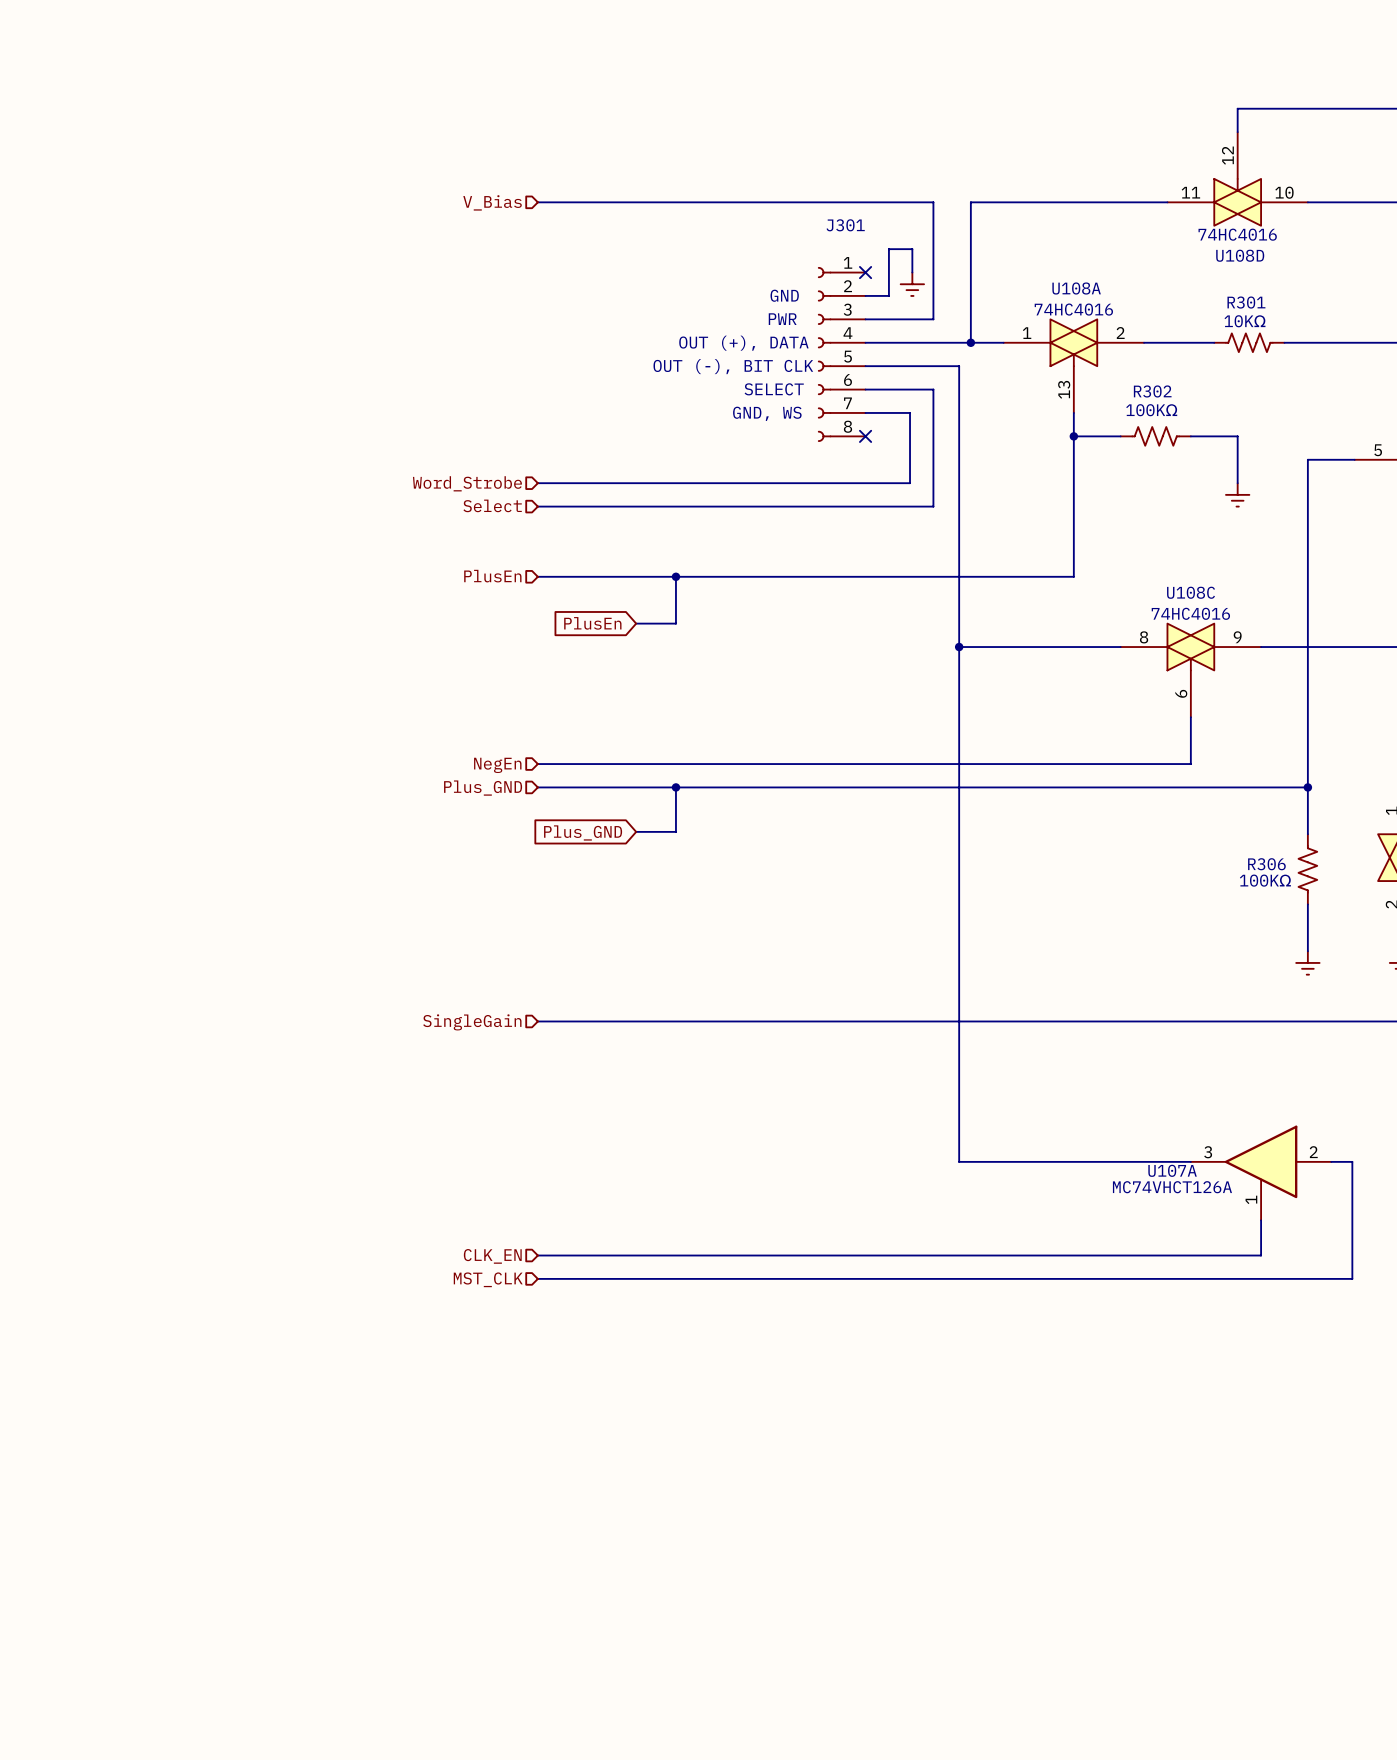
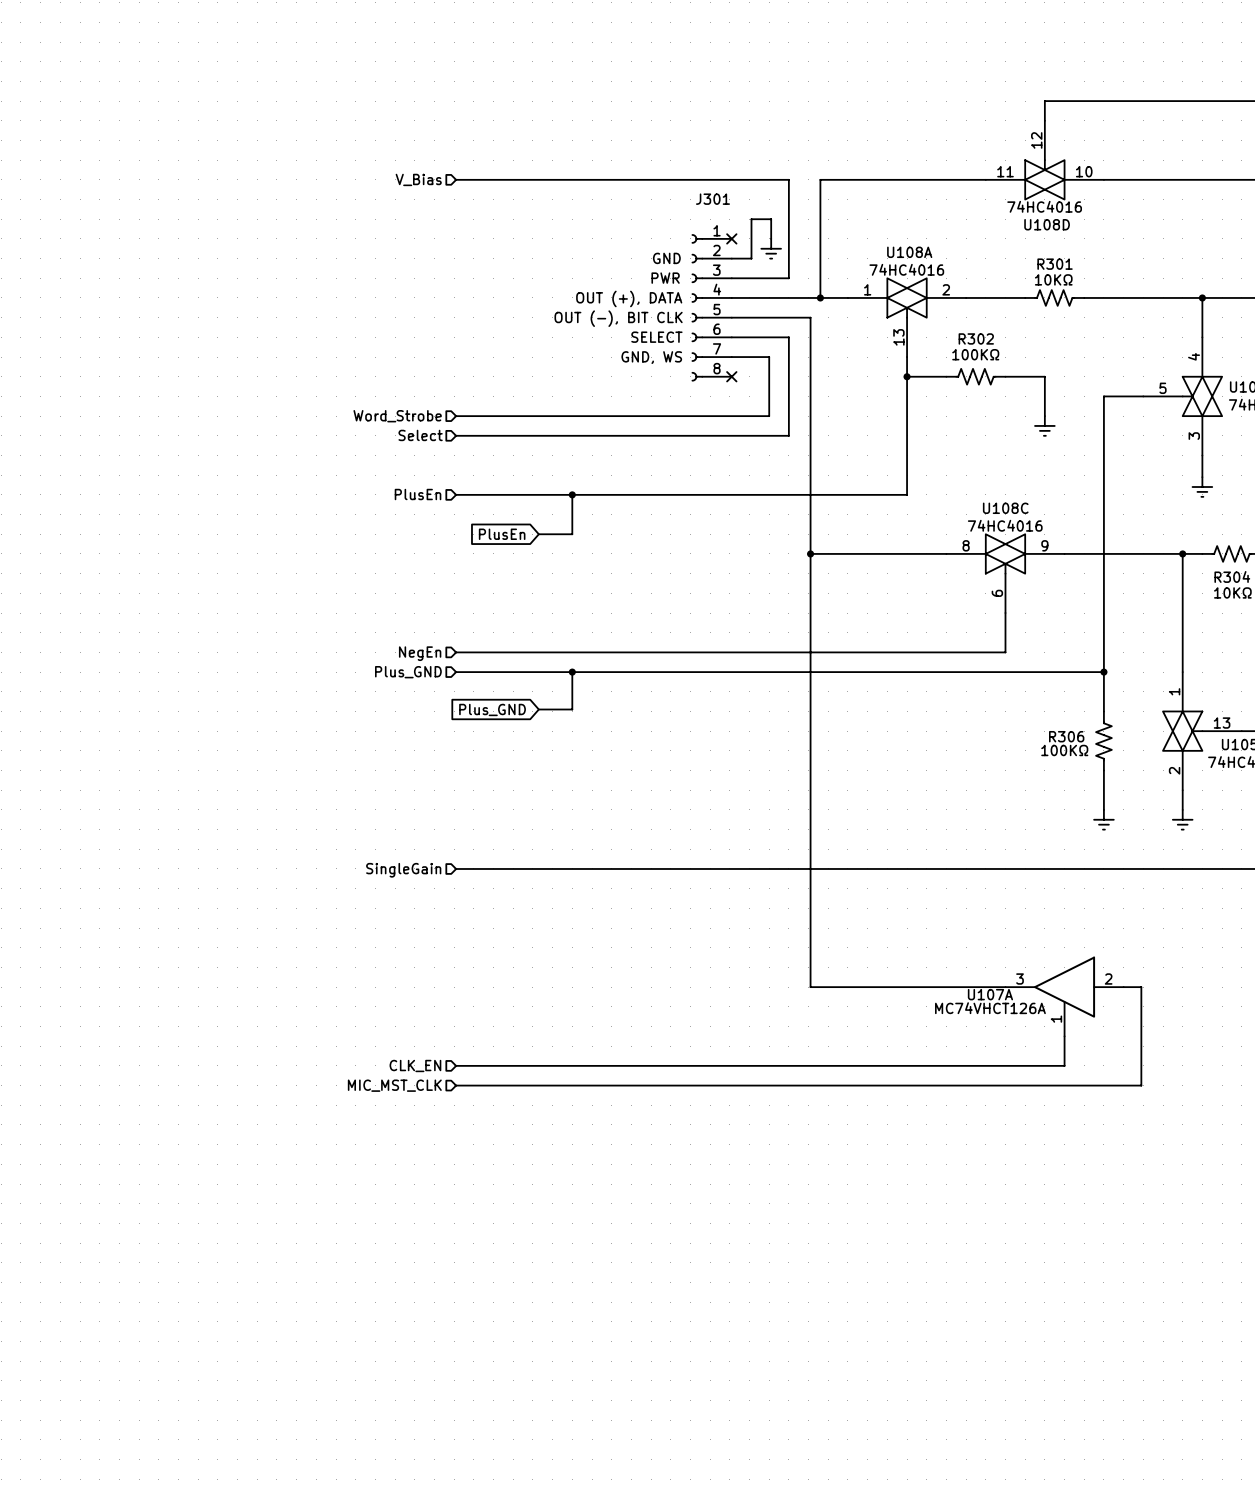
hierarchical label: MST_CLK (488, 1279) -> MIC_MST_CLK (394, 1085)

